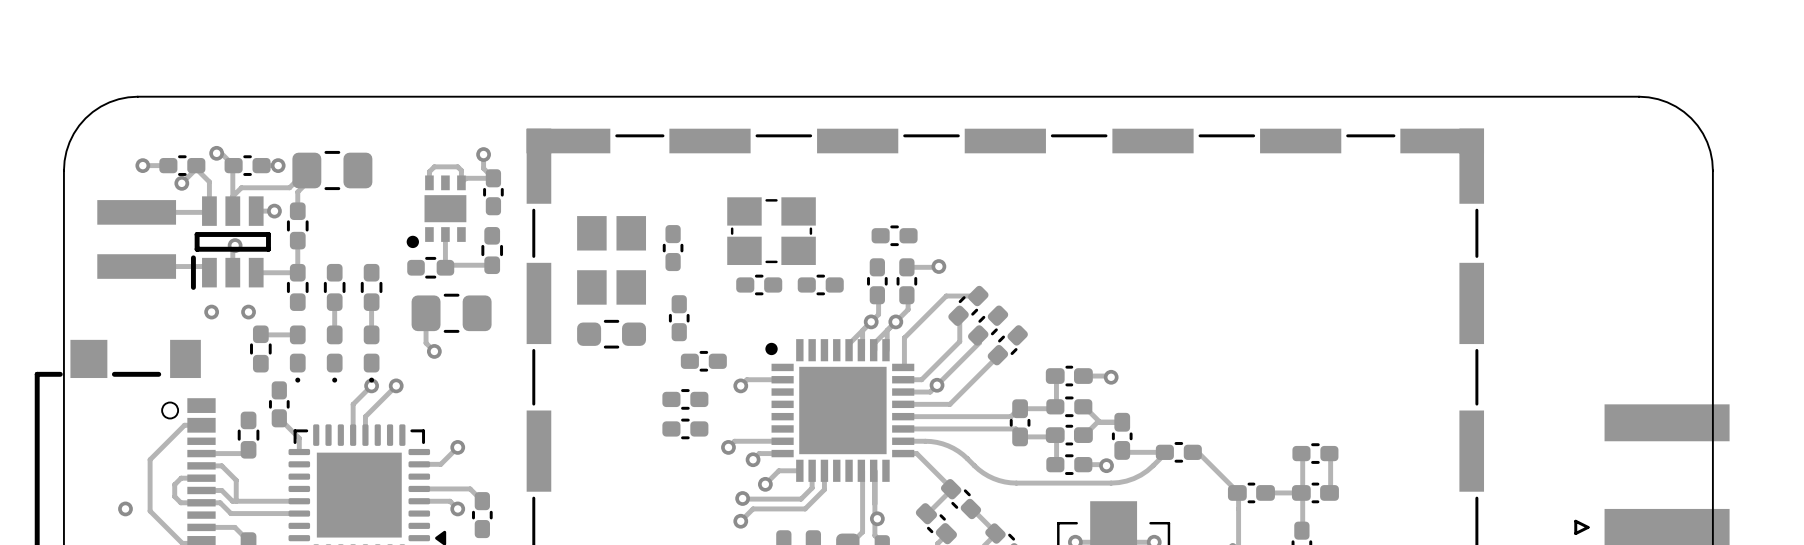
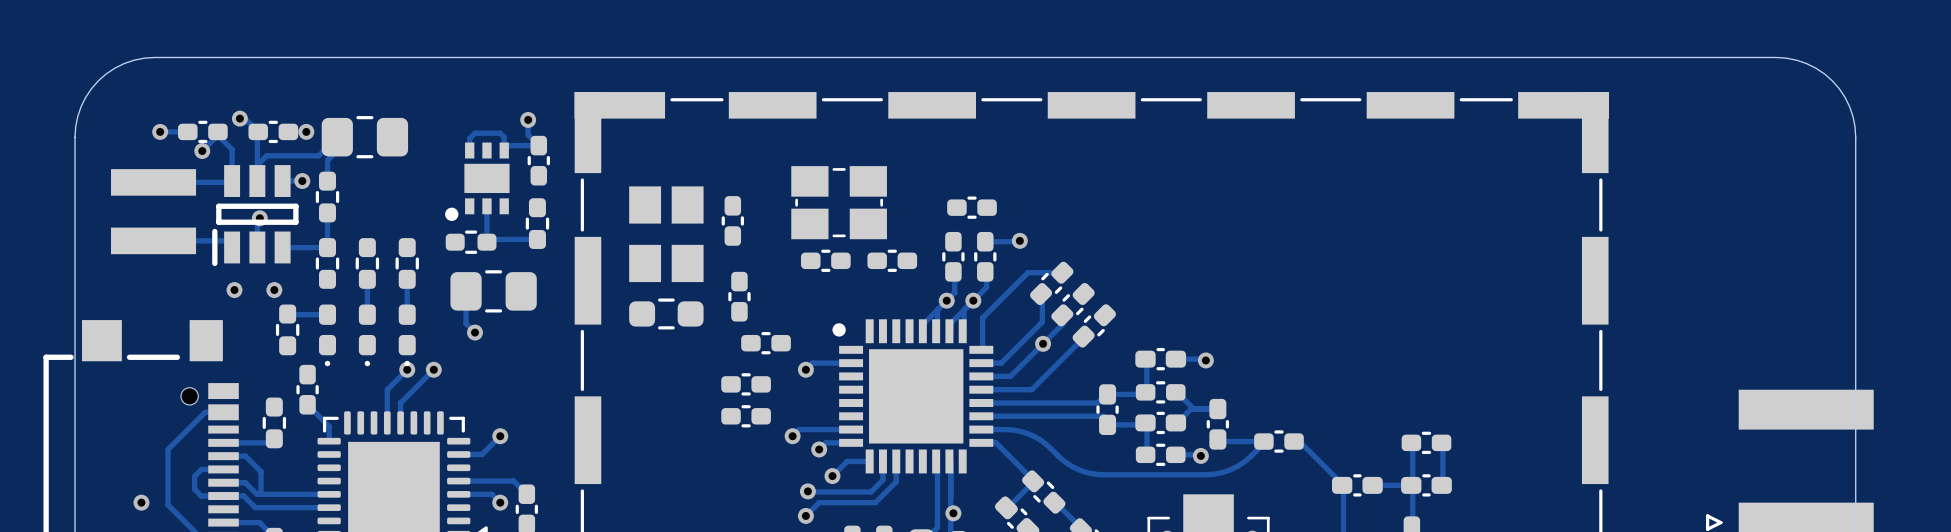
via position: (937, 385) -> (1043, 343)

